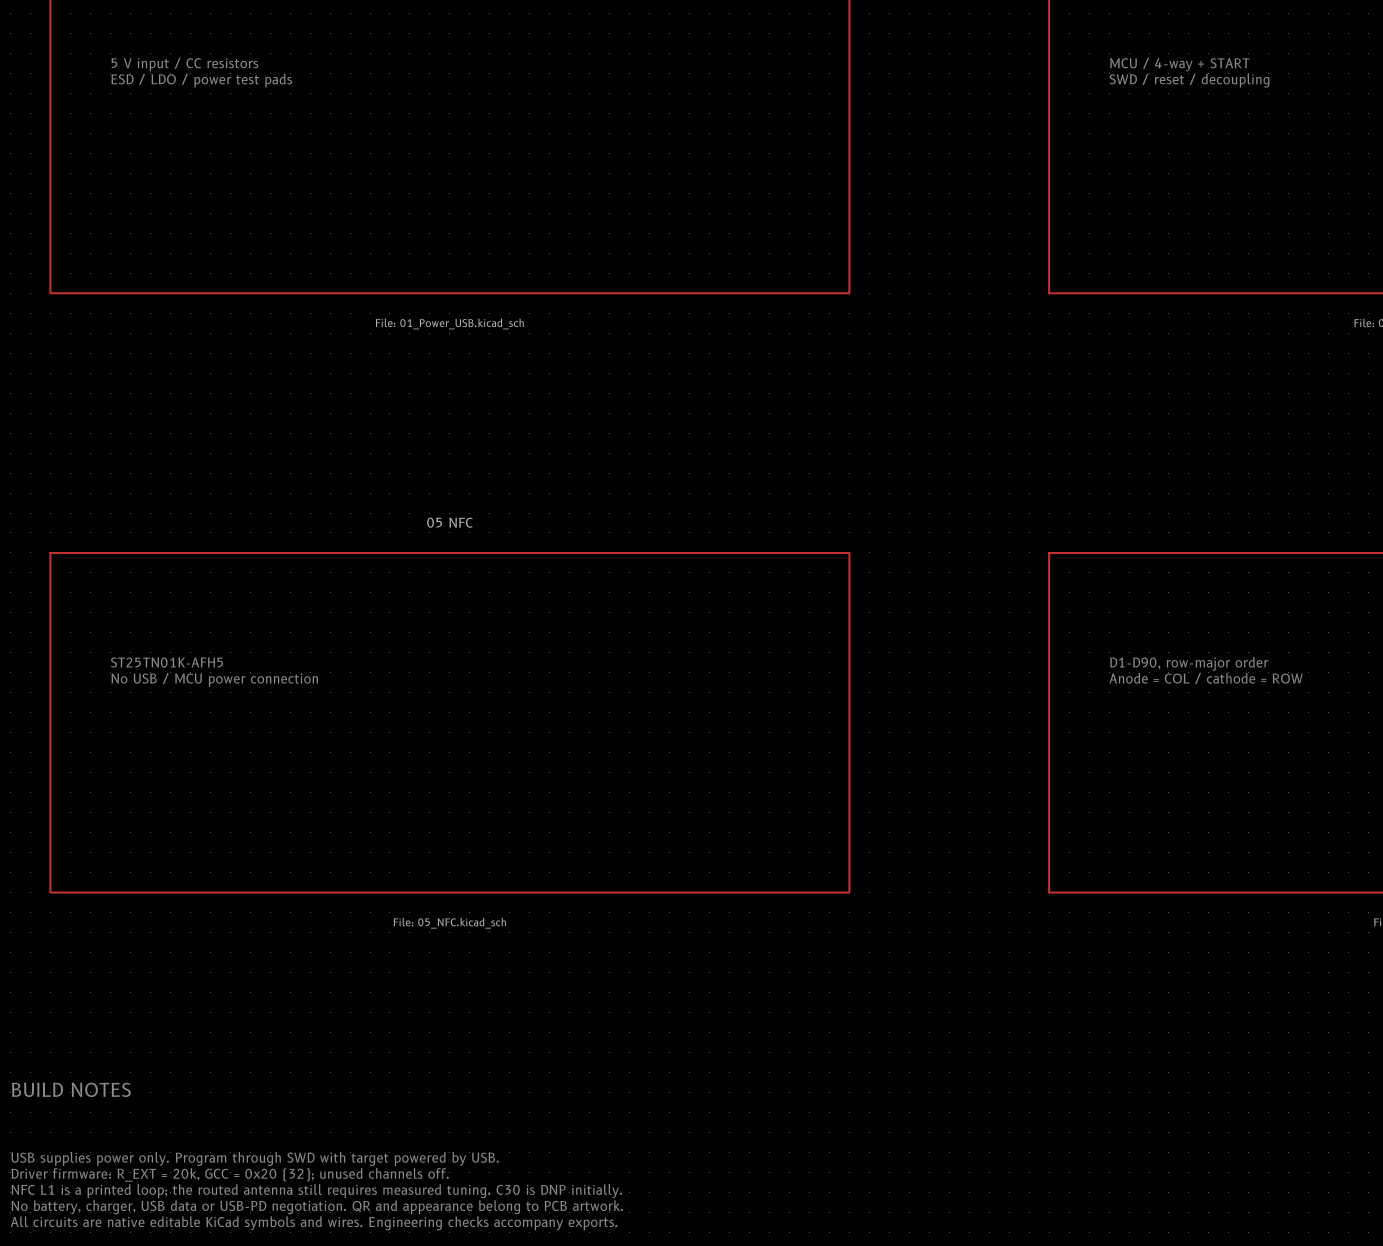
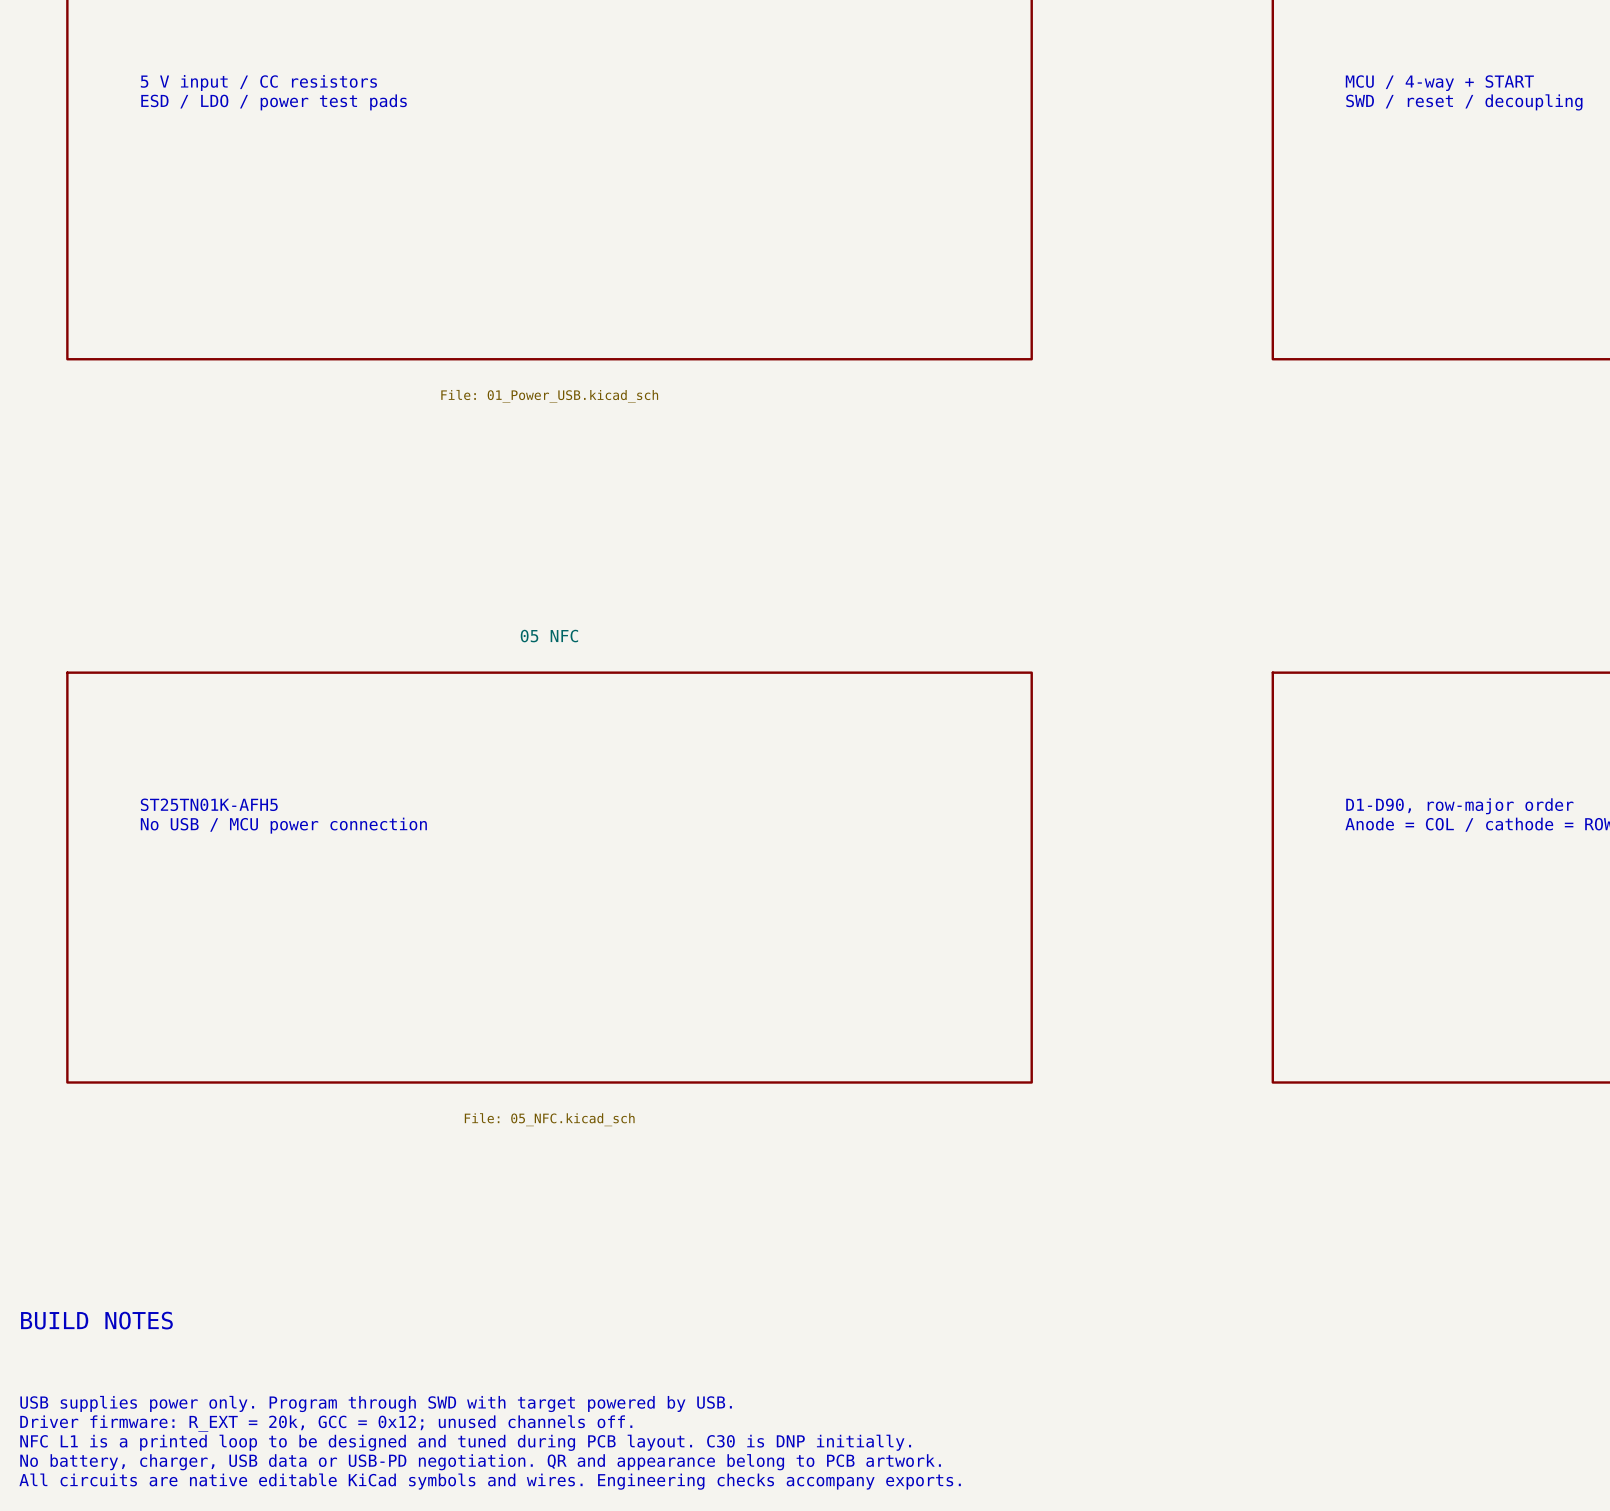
text: Driver firmware: R_EXT = 20k, GCC = 0x20 (32); unused channels off. (230, 1174) -> Driver firmware: R_EXT = 20k, GCC = 0x12; unused channels off. (326, 1423)
text: NFC L1 is a printed loop; the routed antenna still requires measured tuning. C30 is DNP initially. (316, 1191) -> NFC L1 is a printed loop to be designed and tuned during PCB layout. C30 is DNP initially. (465, 1442)

